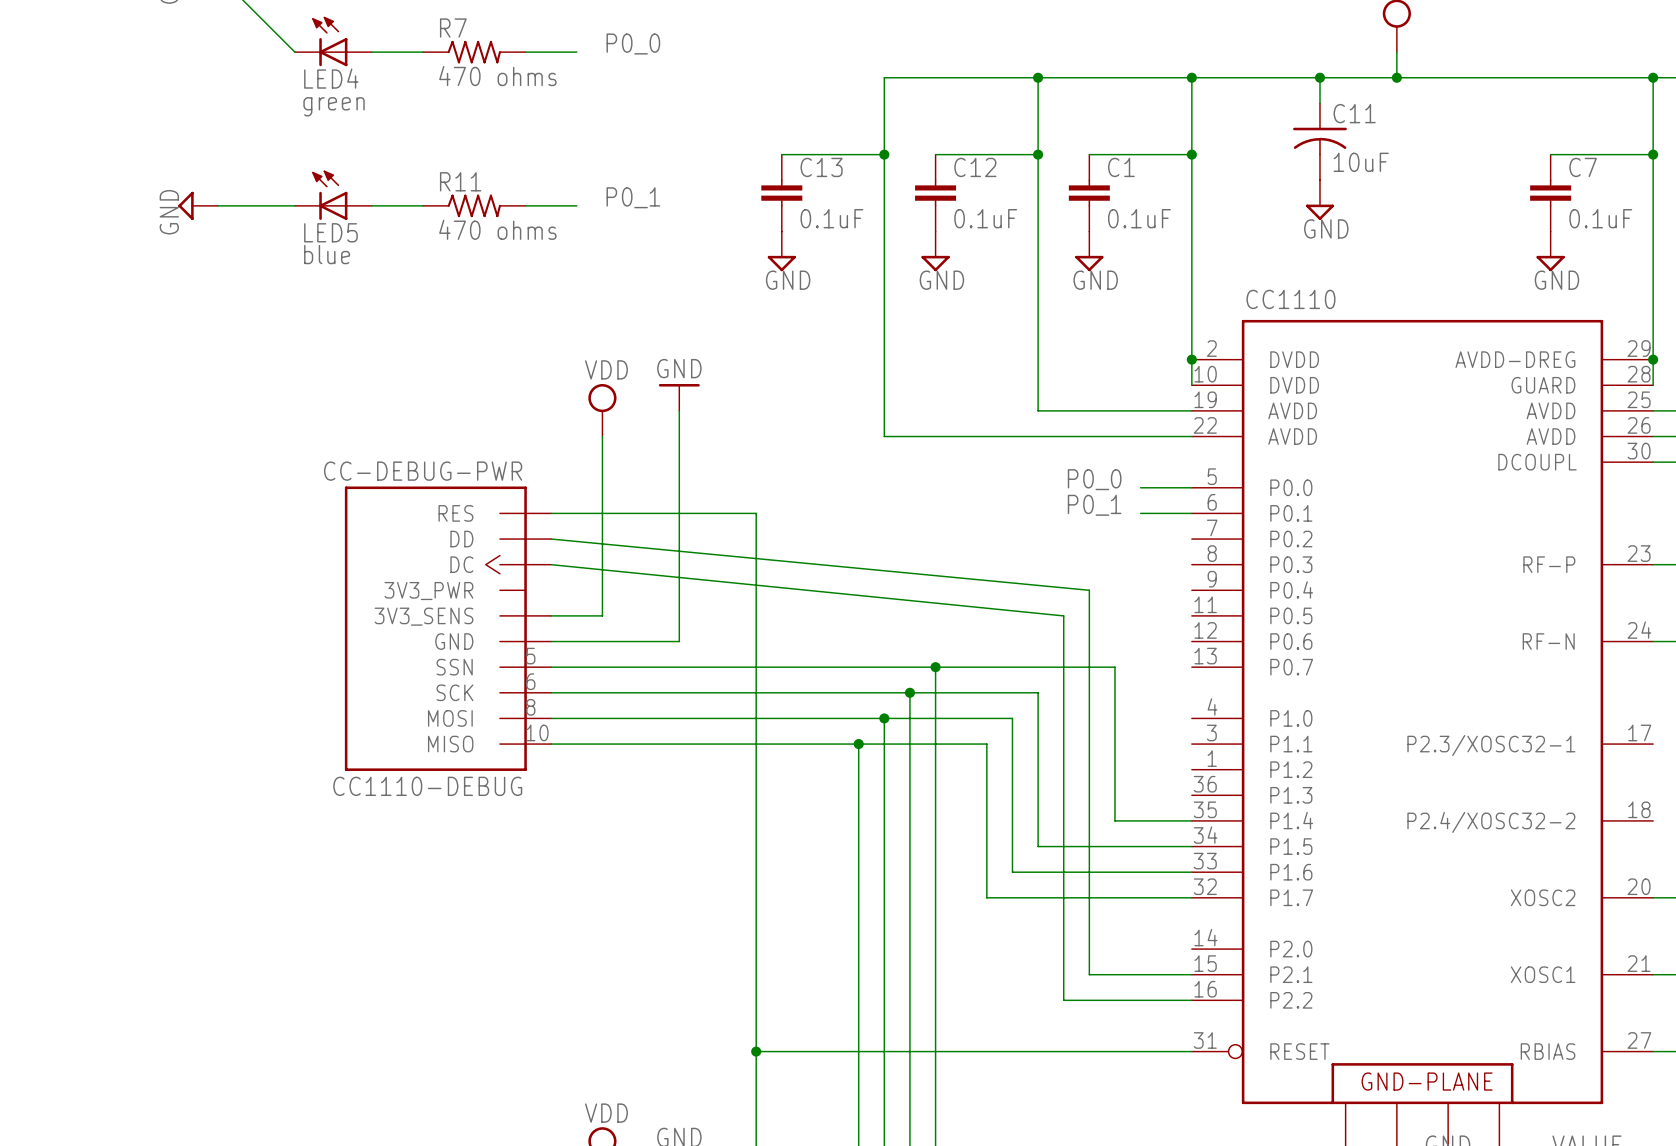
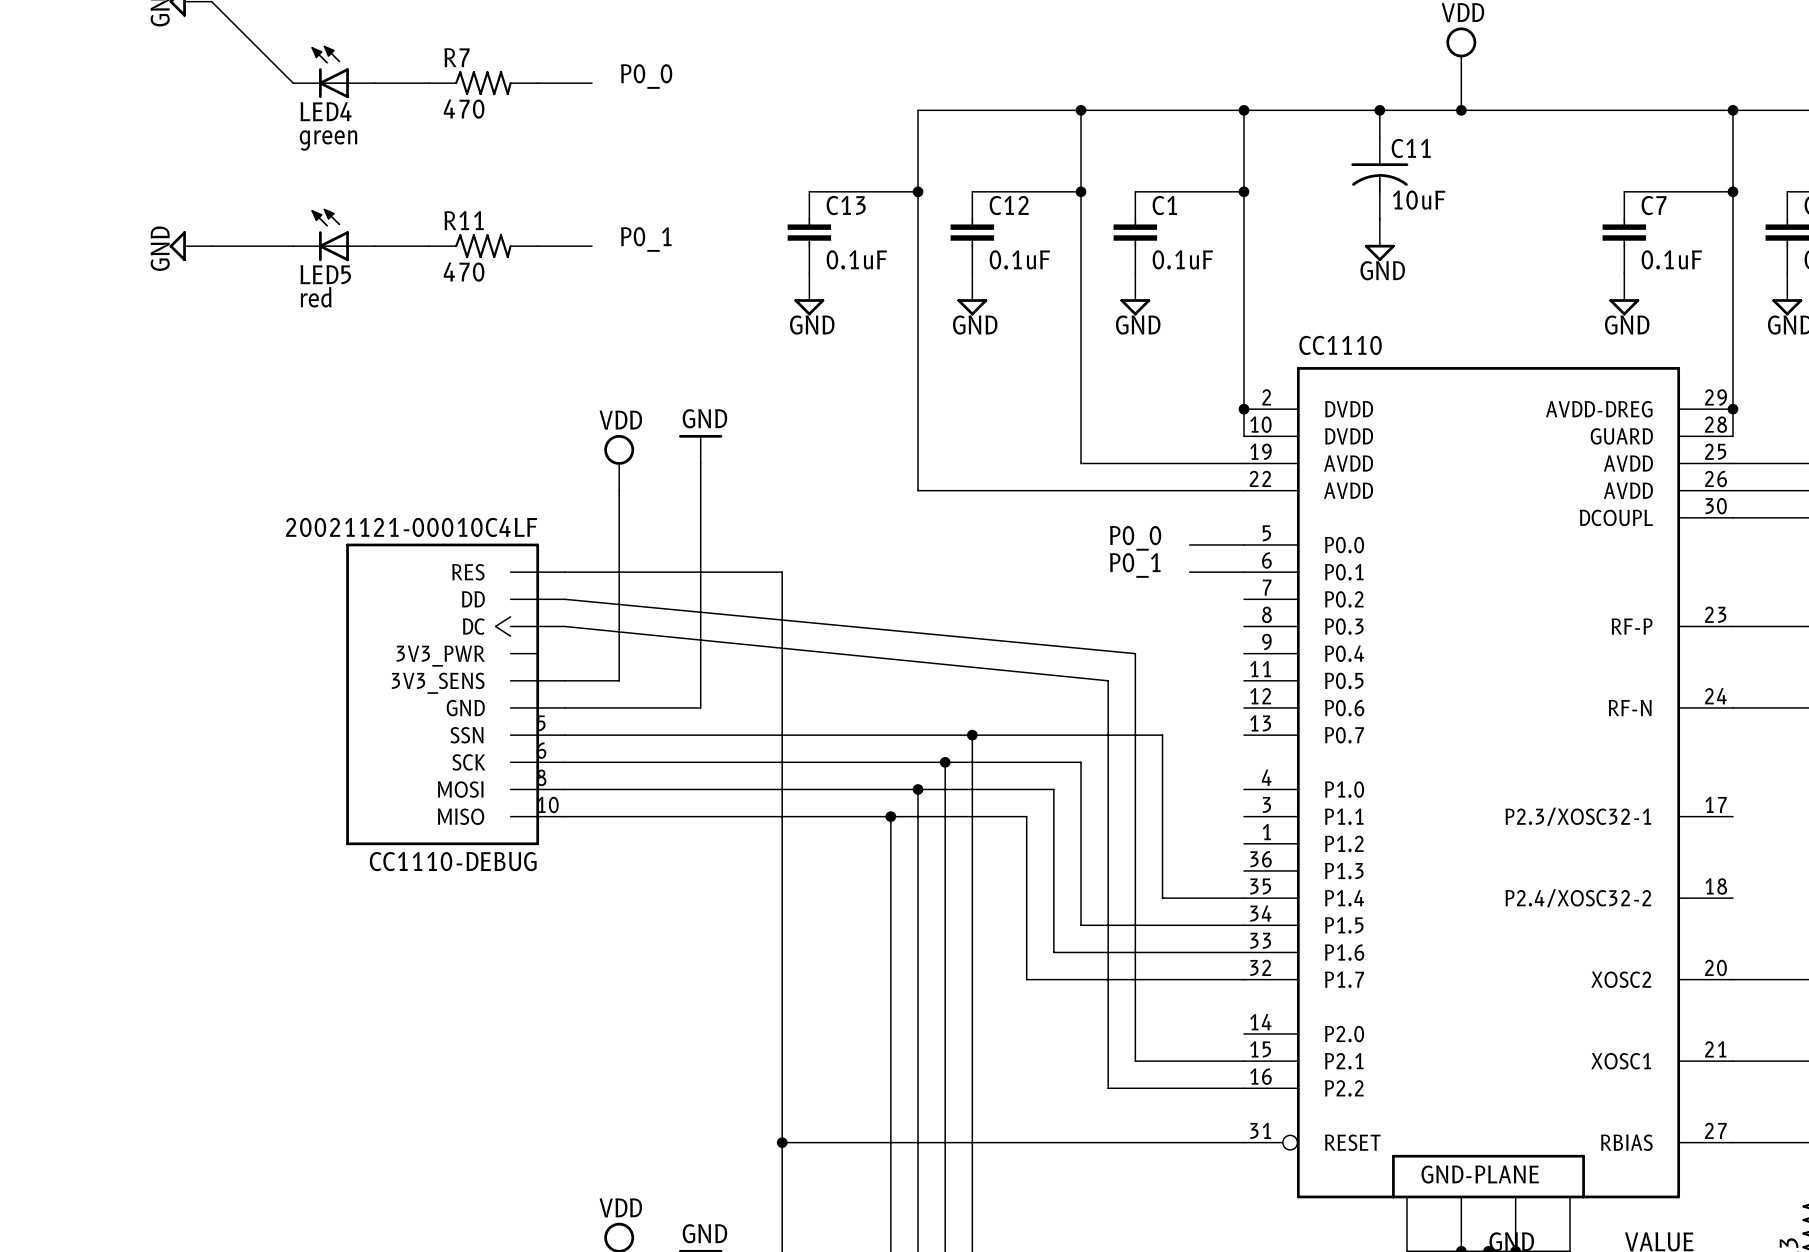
R7 value: 470 ohms (497, 76) -> 470 (464, 109)
R11 value: 470 ohms (497, 229) -> 470 (464, 272)
LED5 value: blue (327, 254) -> red (316, 297)
CC1110-DEBUG value: CC-DEBUG-PWR (423, 471) -> 20021121-00010C4LF (411, 527)

